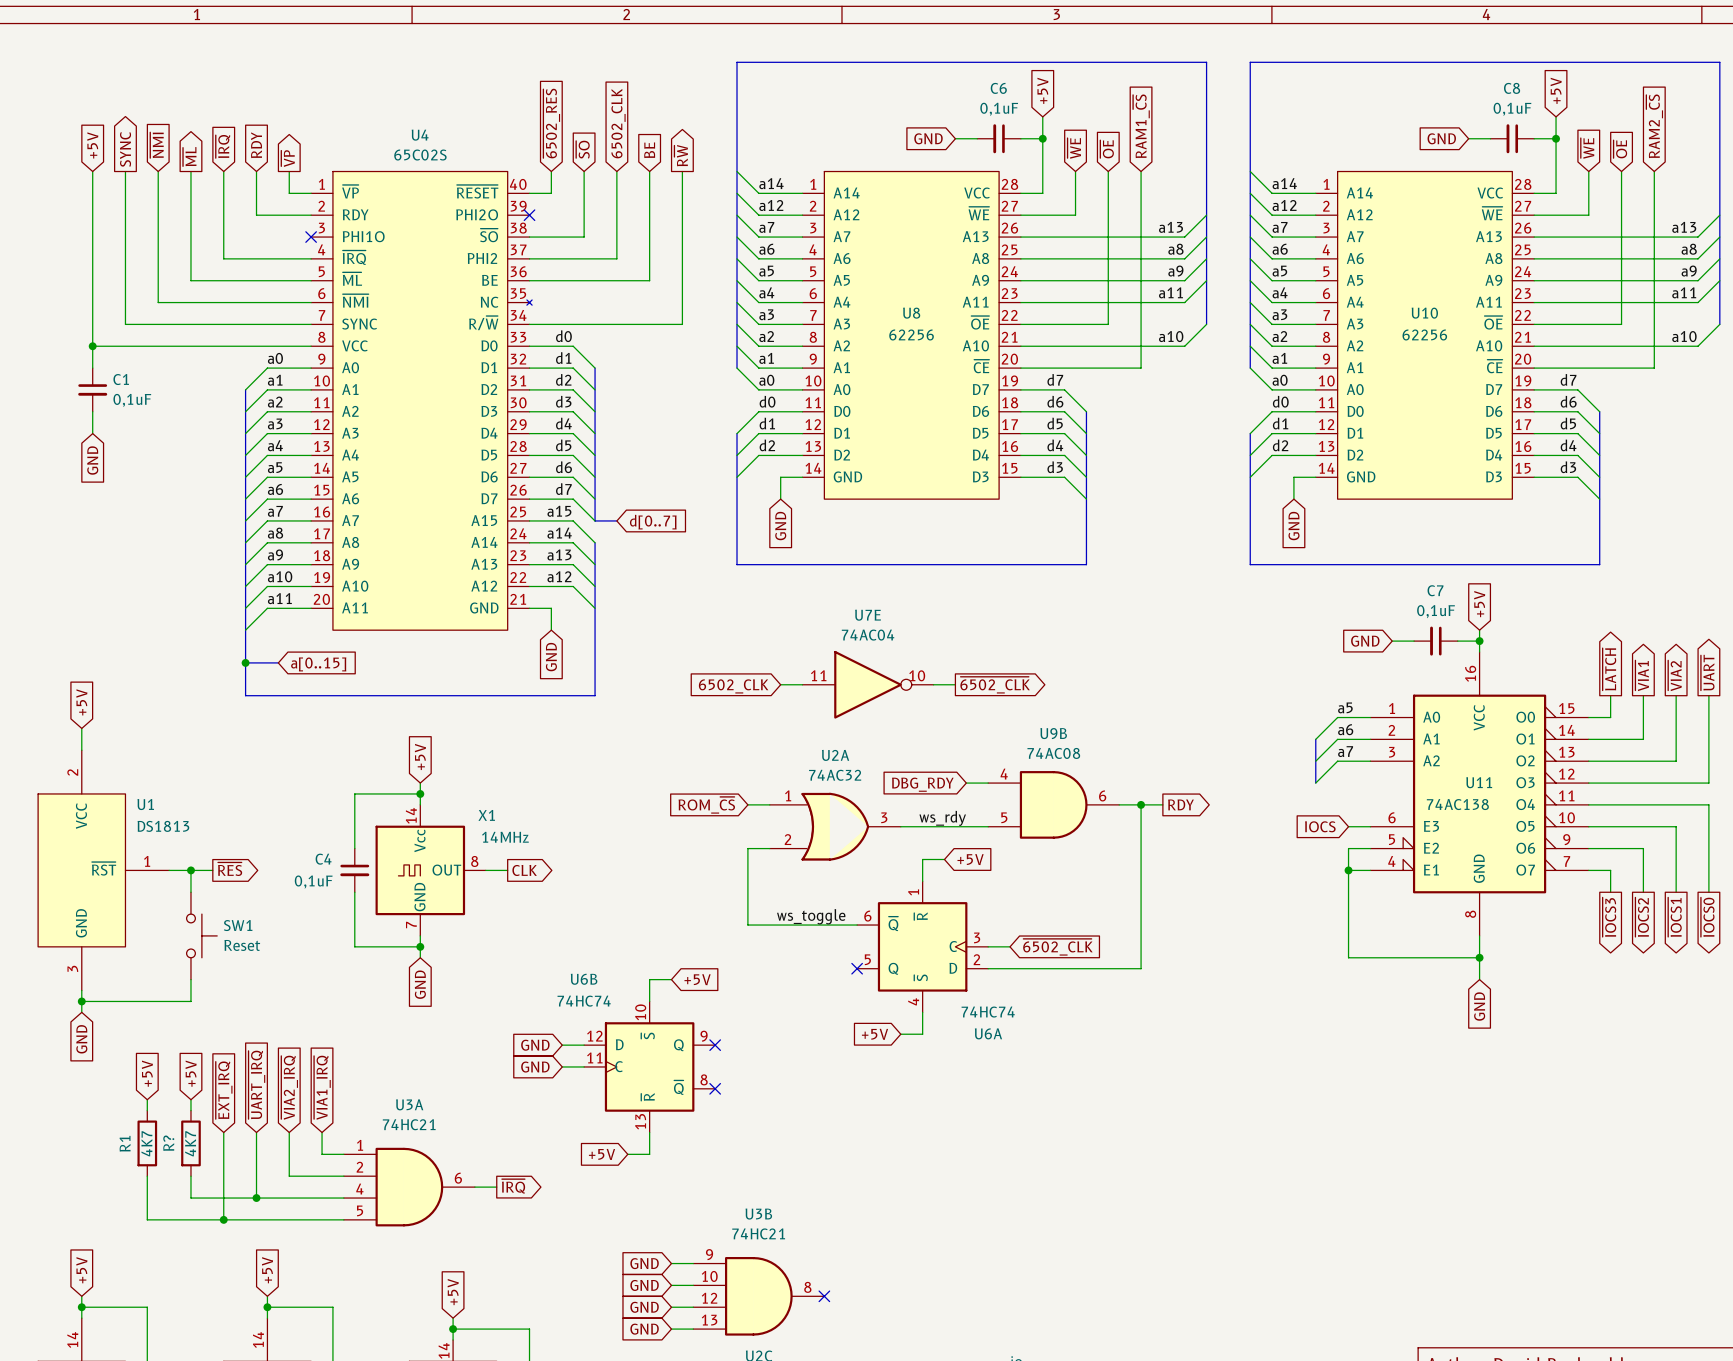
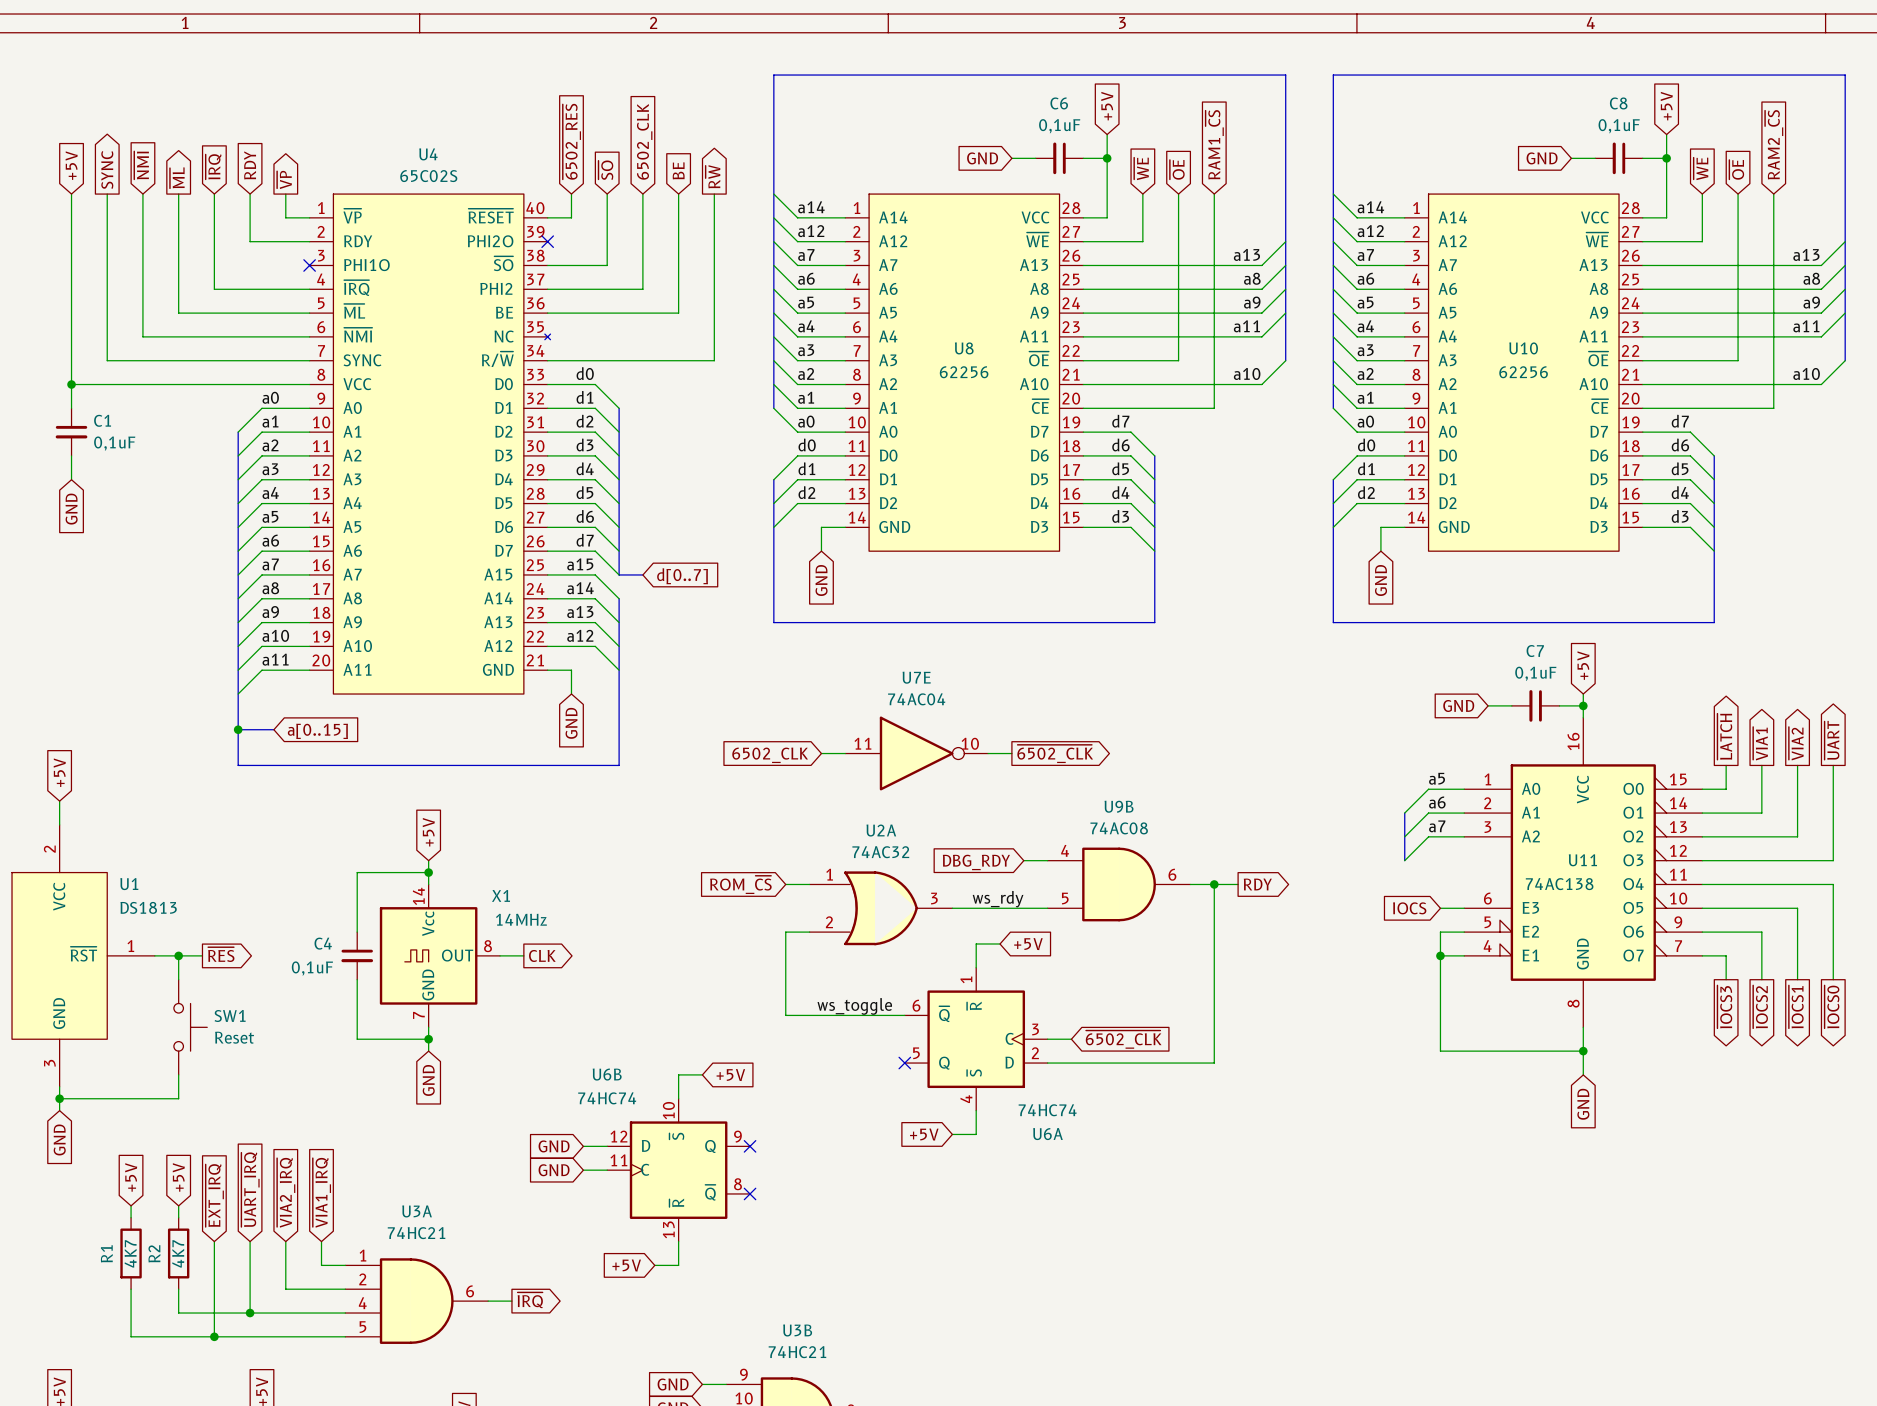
R? name: R? (168, 1143) -> R2 (154, 1253)

